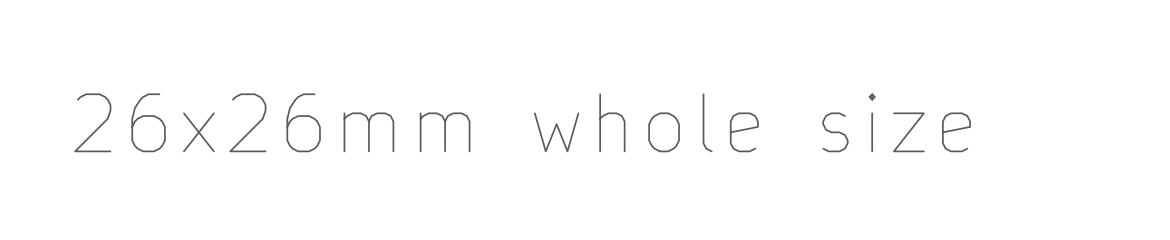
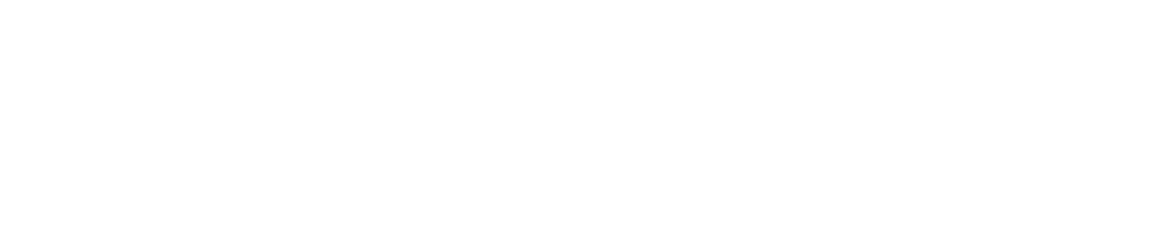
text: 26x26mm whole size (522, 122) -> none

